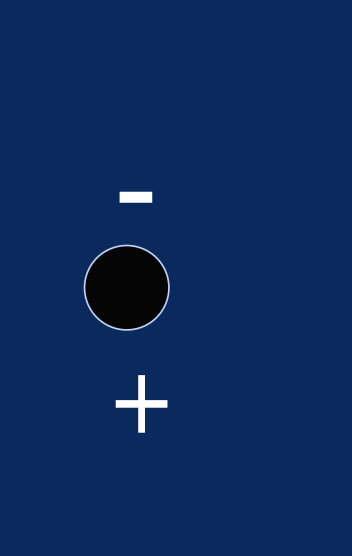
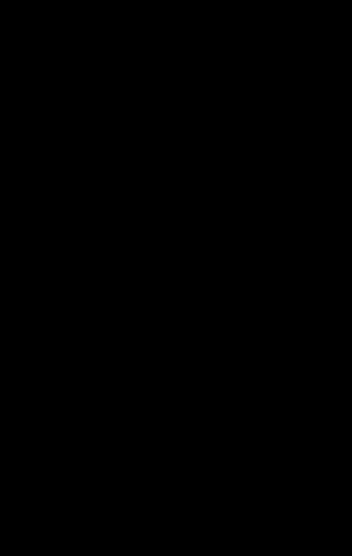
text: - (135, 197) -> none
hole: (126, 287) -> none
text: + (141, 403) -> none

